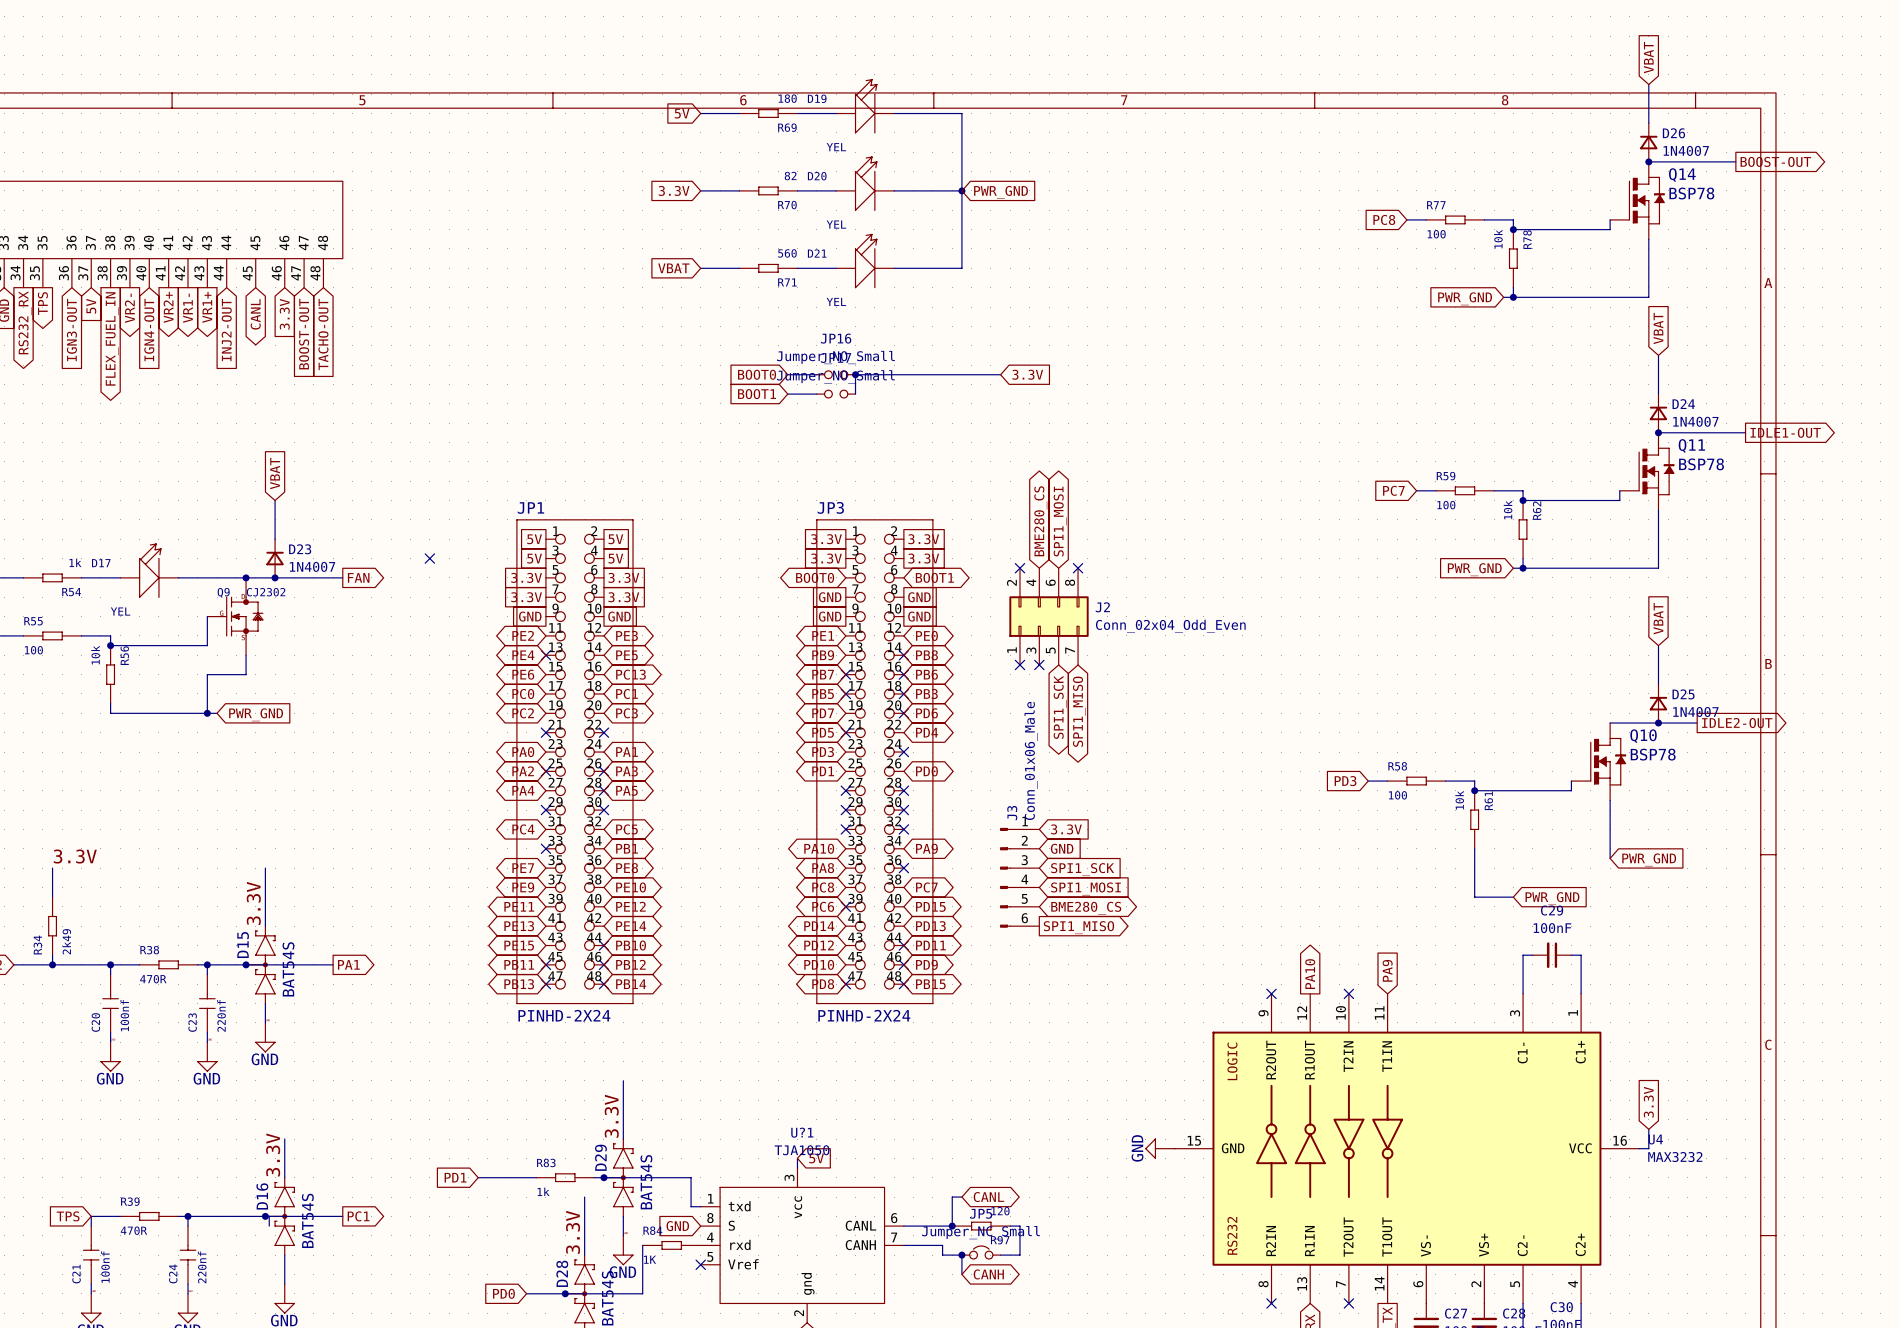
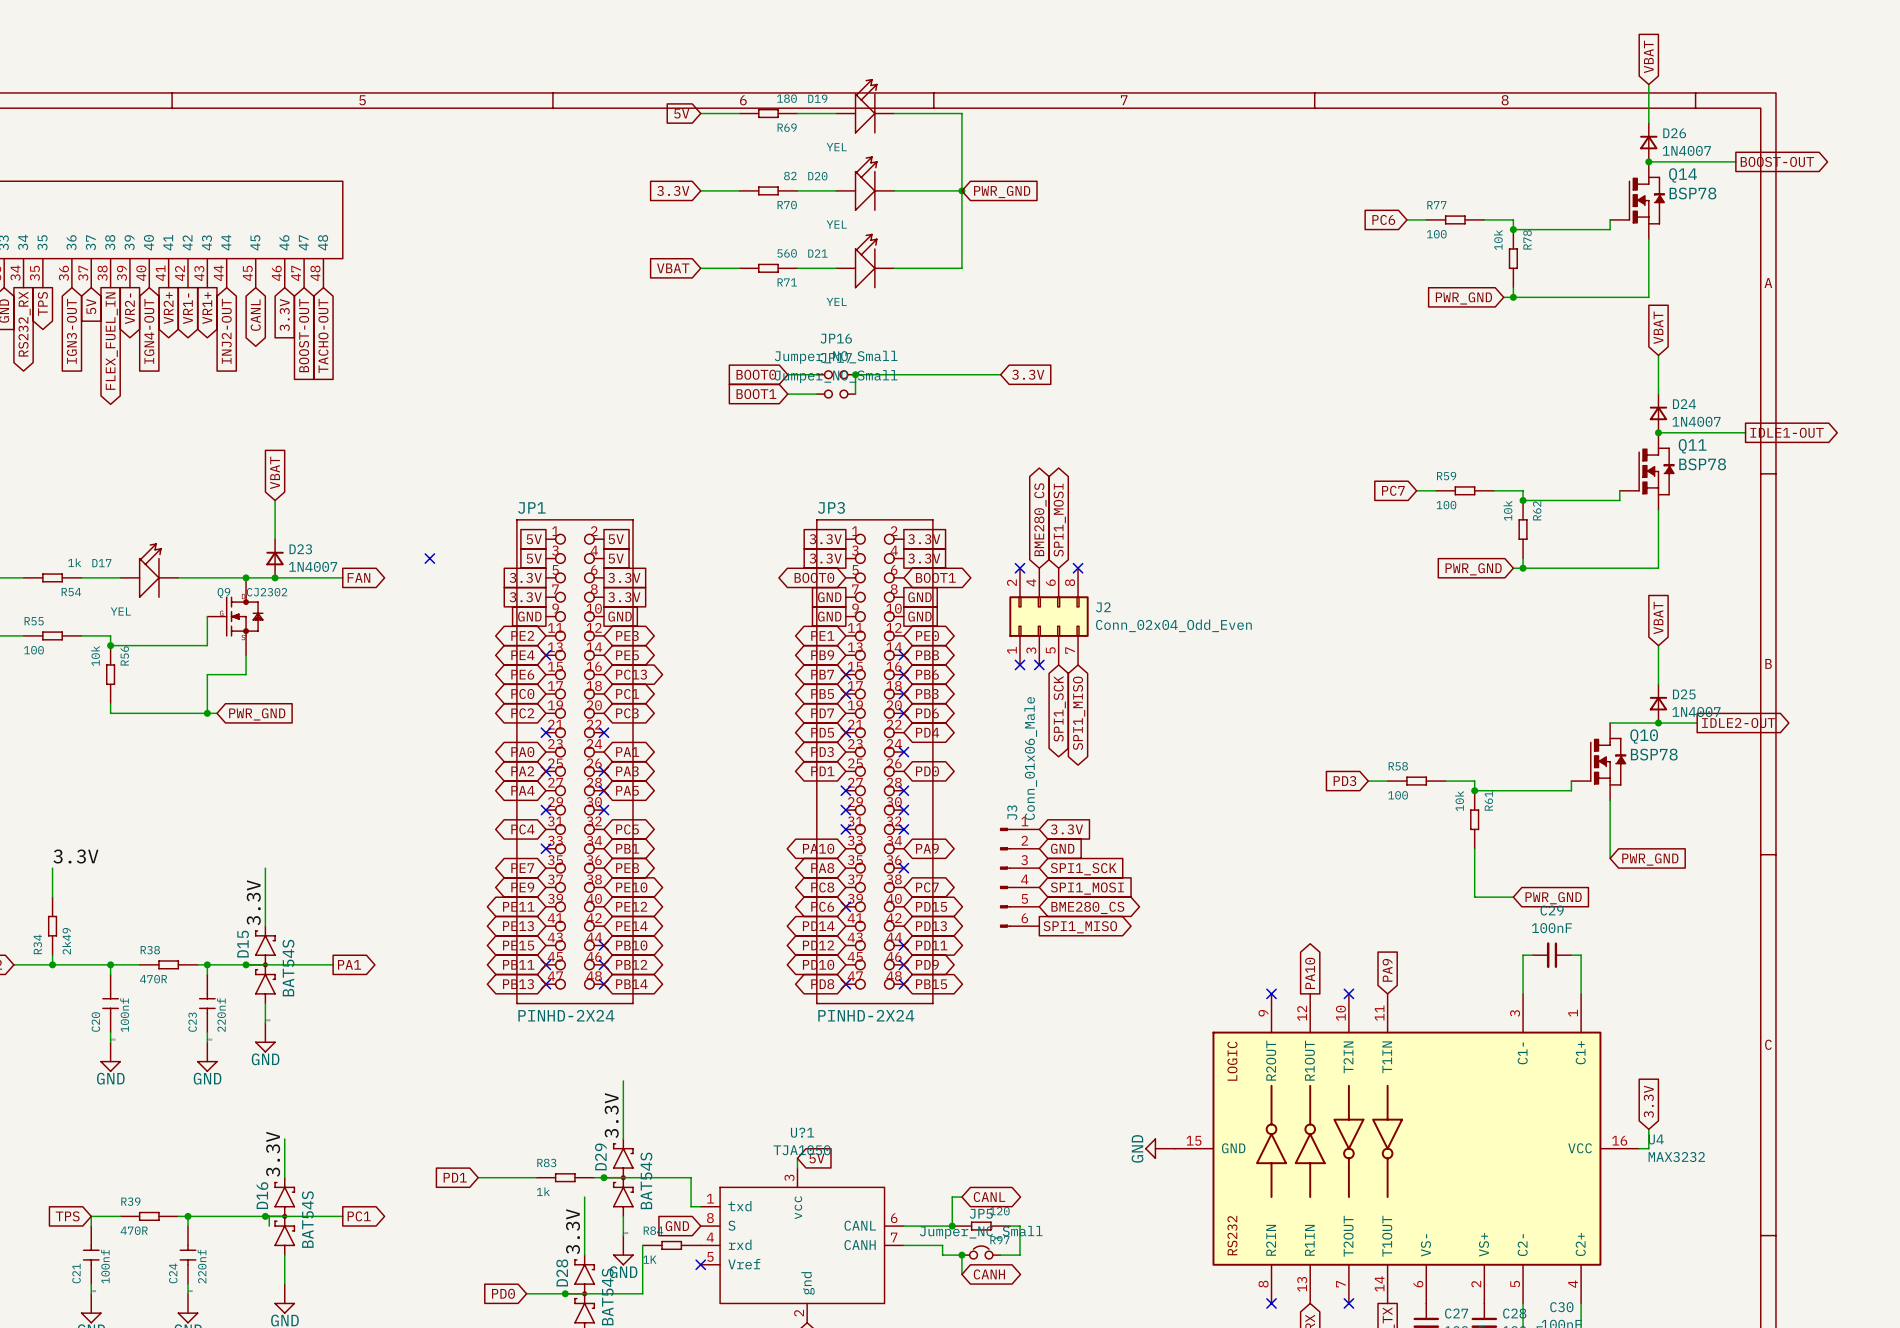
global label: PC8 (1384, 219) -> PC6 (1383, 219)

